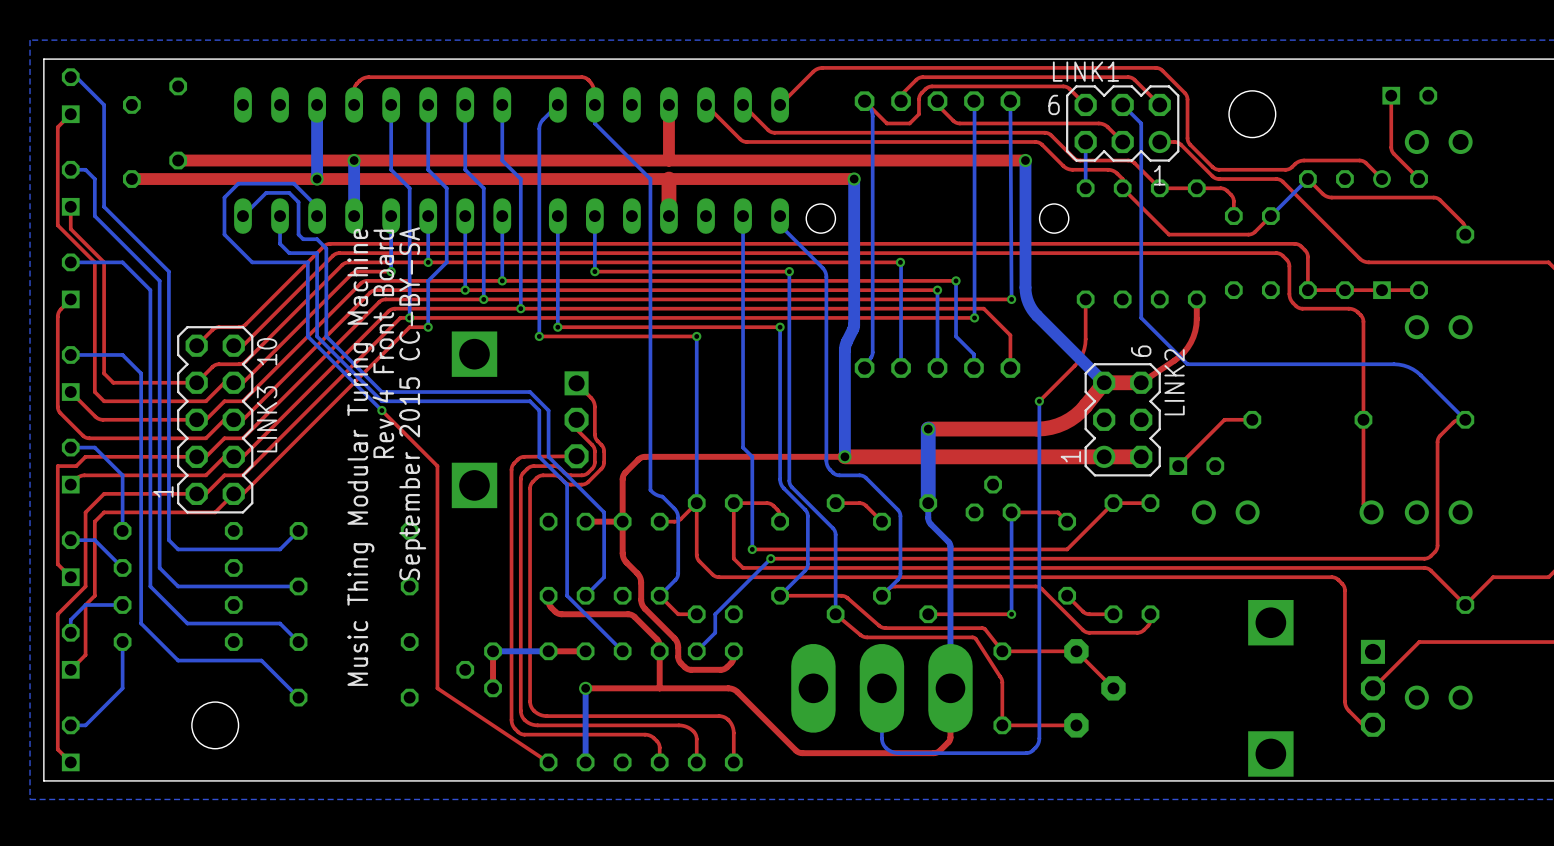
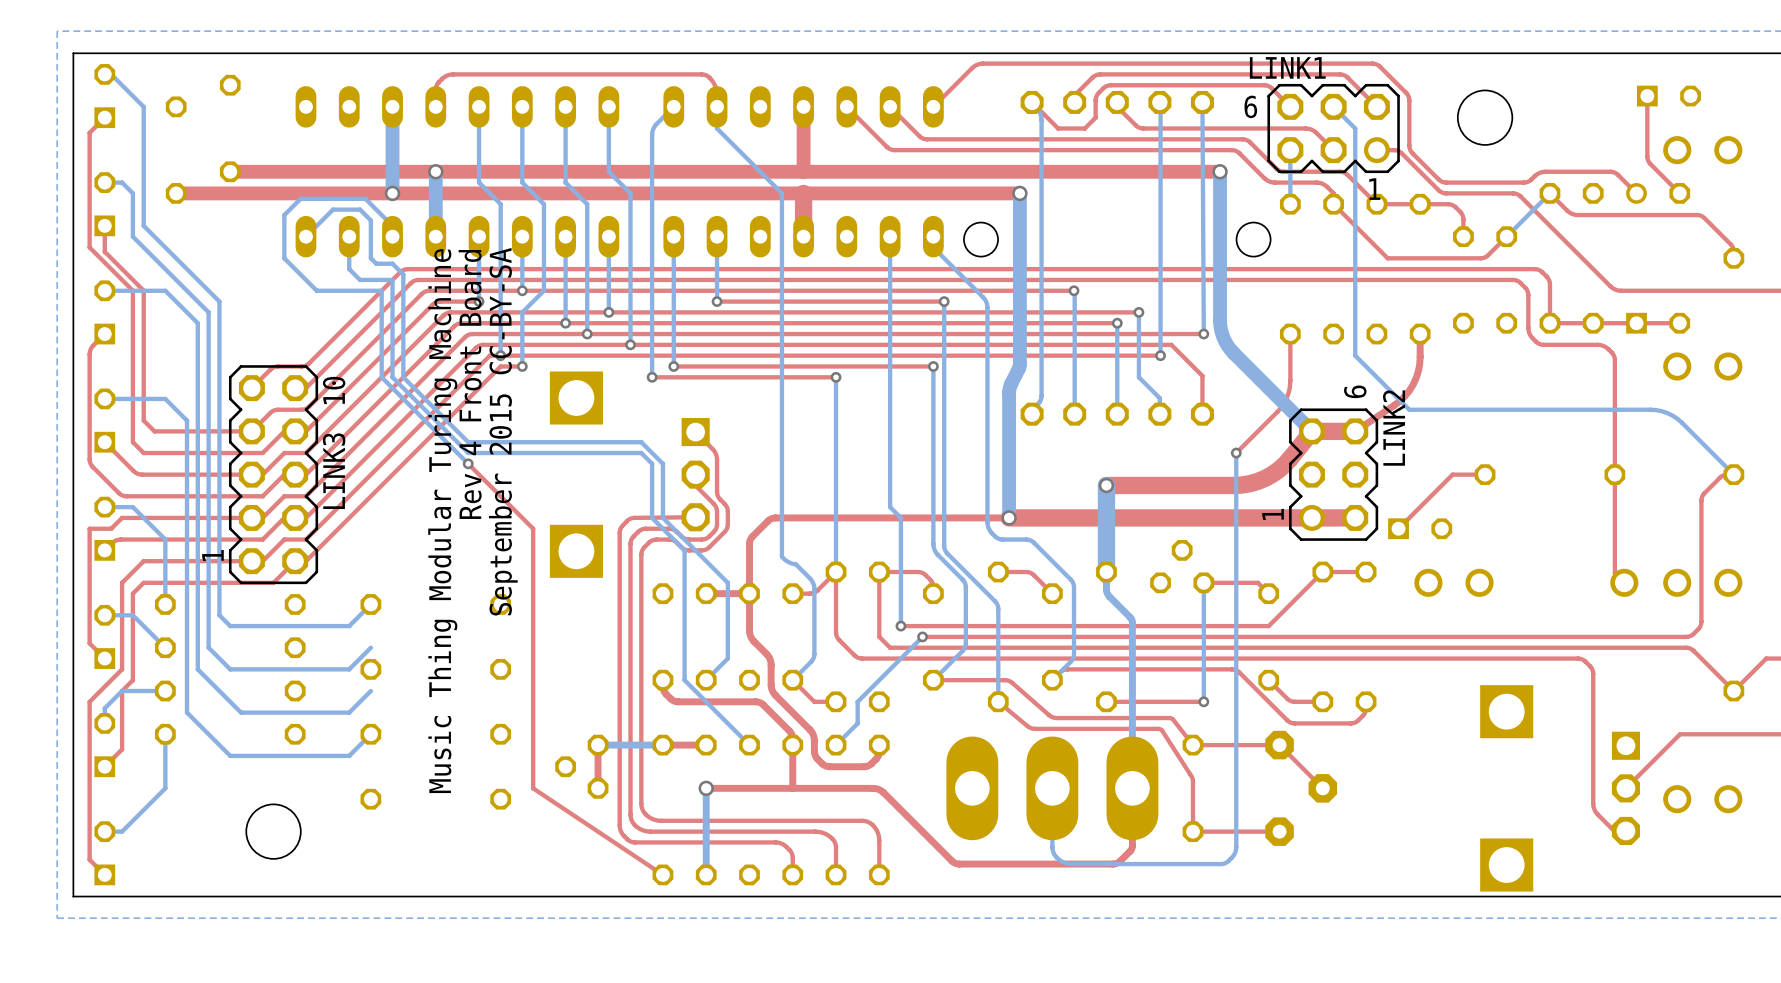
bottom track: (298, 586) (280, 586) -> (370, 647) (349, 669)
bottom track: (280, 623) (298, 642) -> (349, 712) (370, 691)
bottom track: (261, 660) (298, 697) -> (327, 755) (349, 755) (370, 734)

